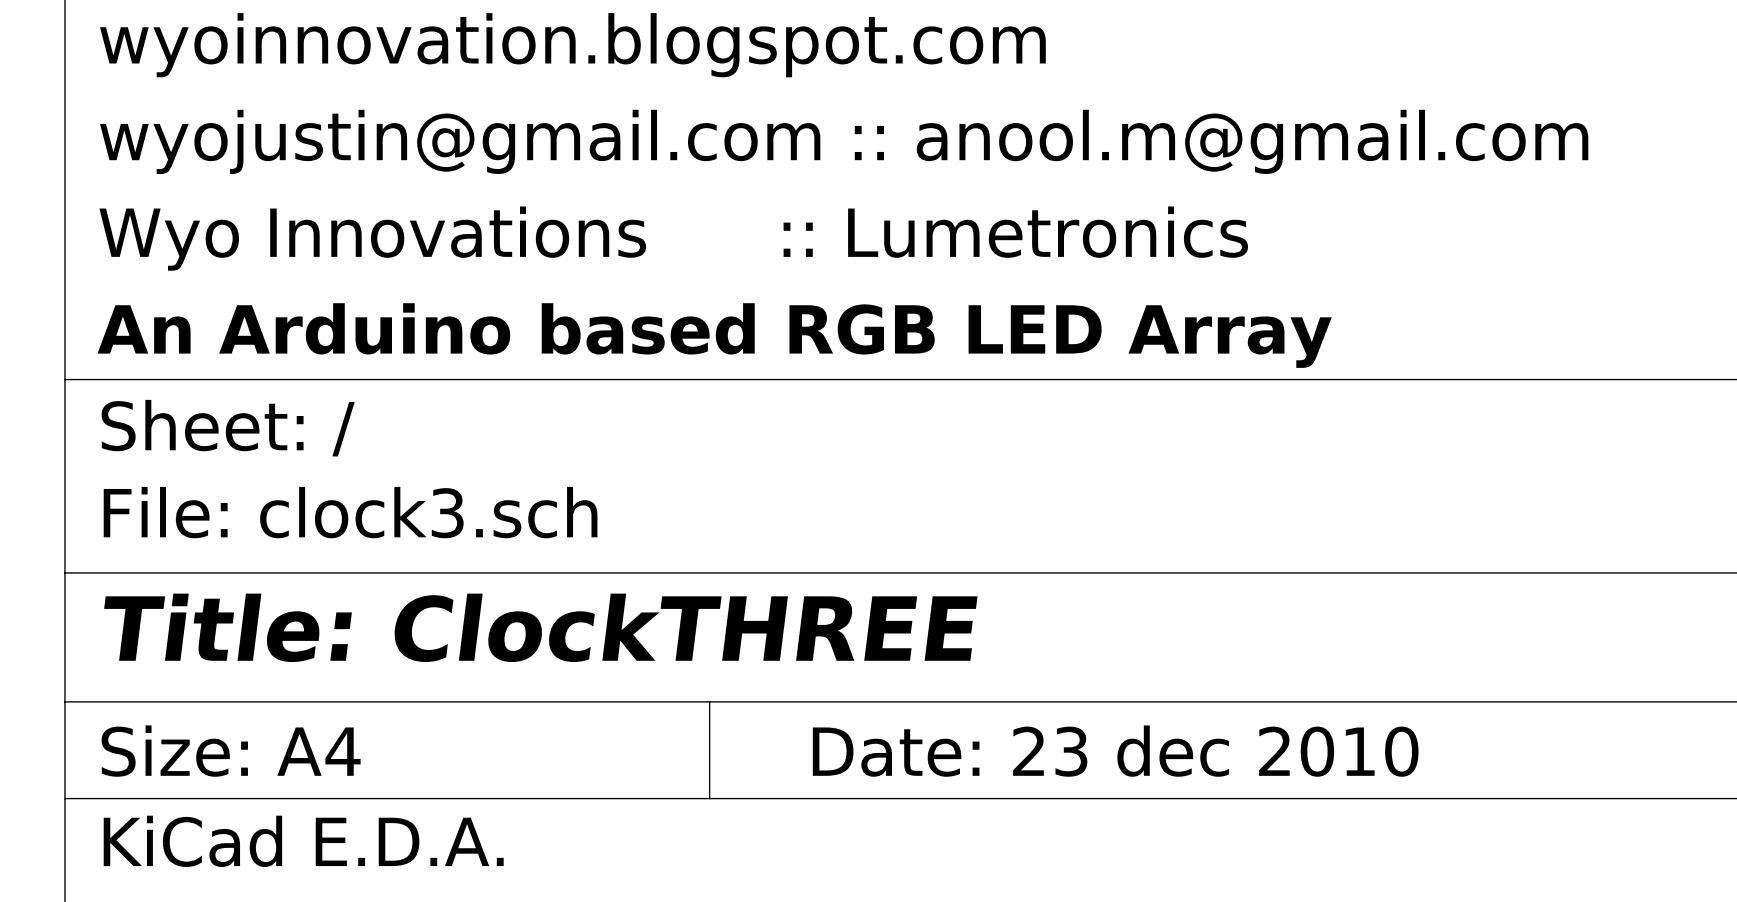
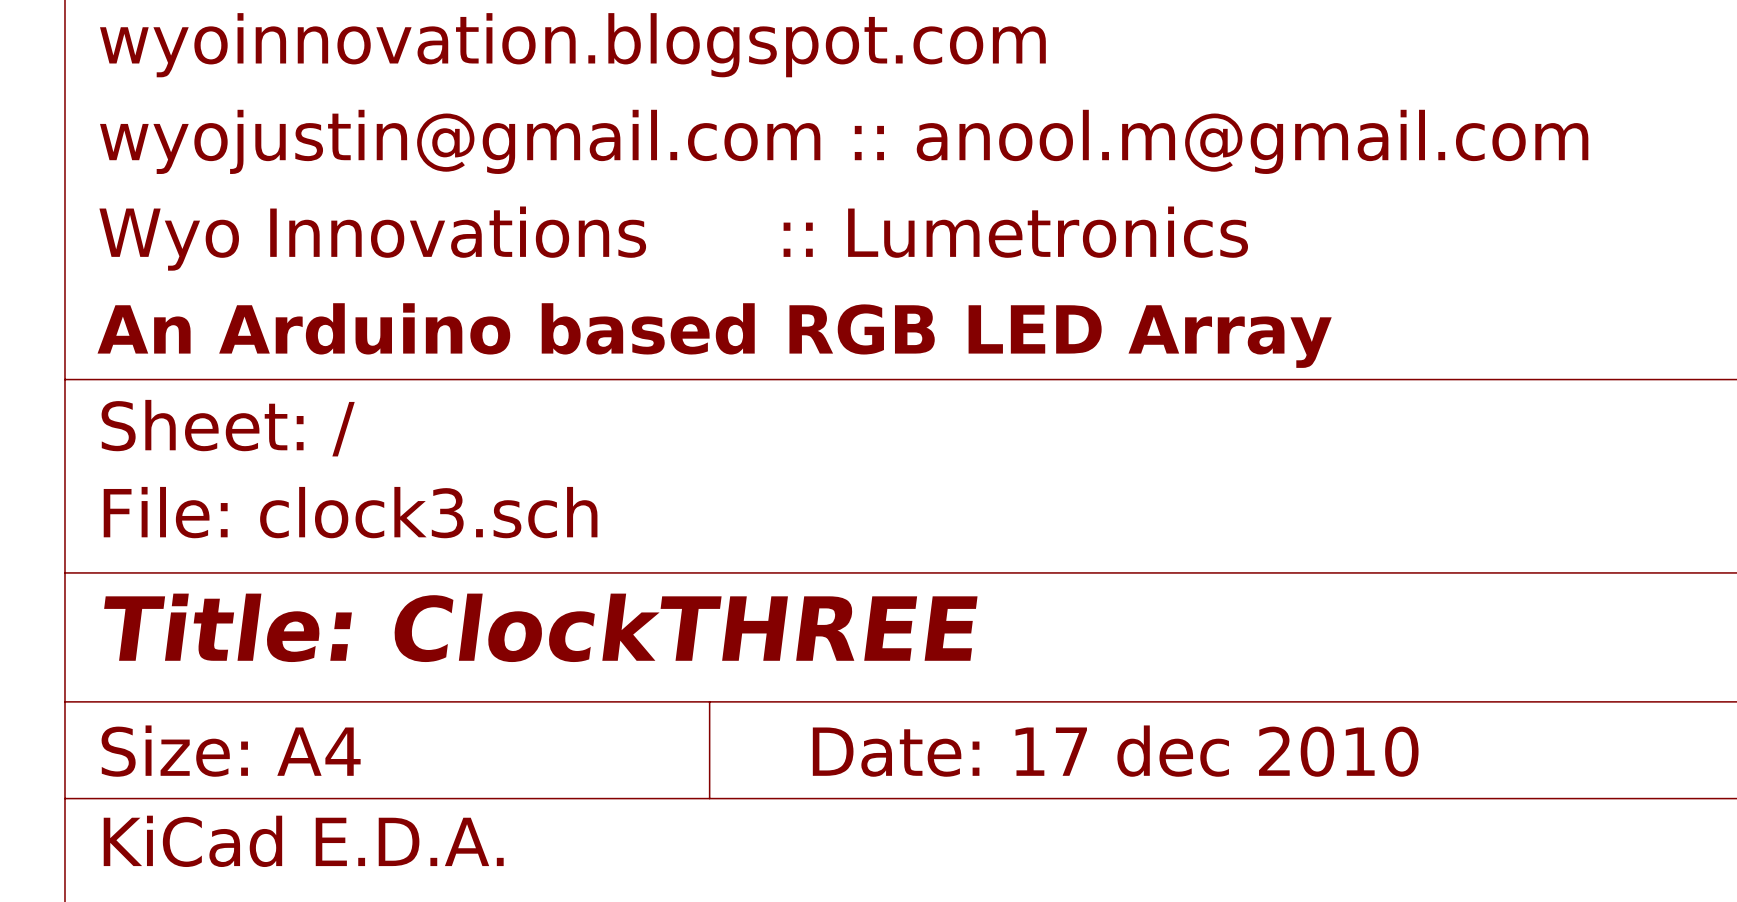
title block: Date: 23 dec 2010 (1115, 751) -> Date: 17 dec 2010 (1115, 751)

